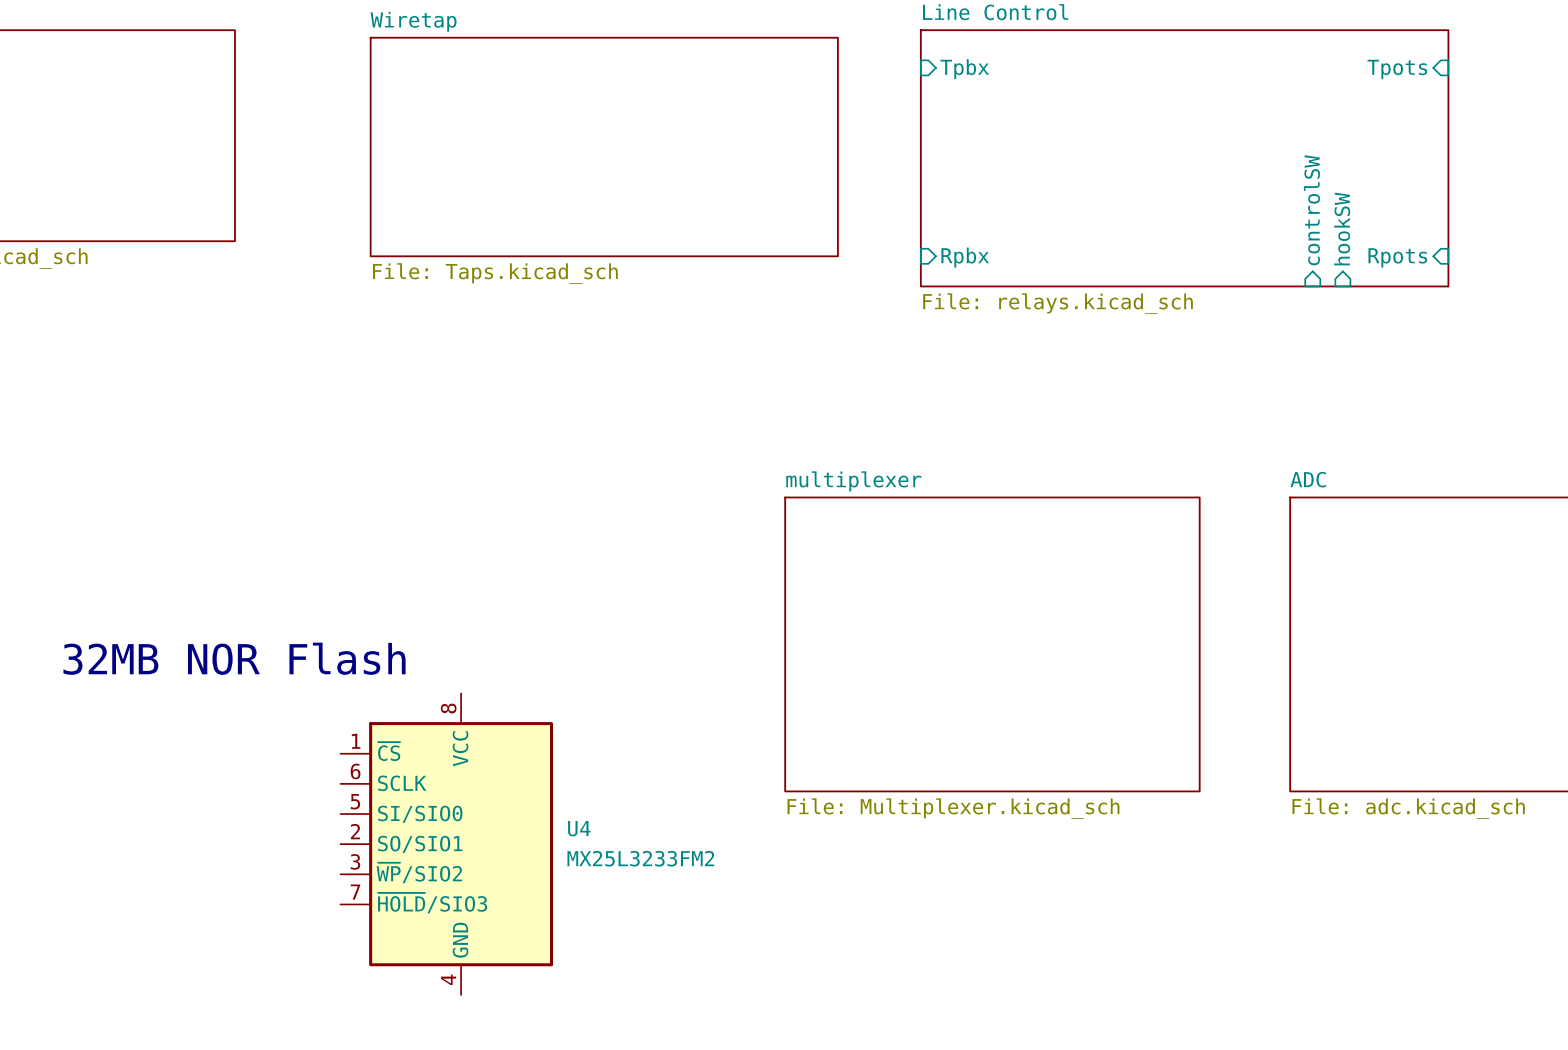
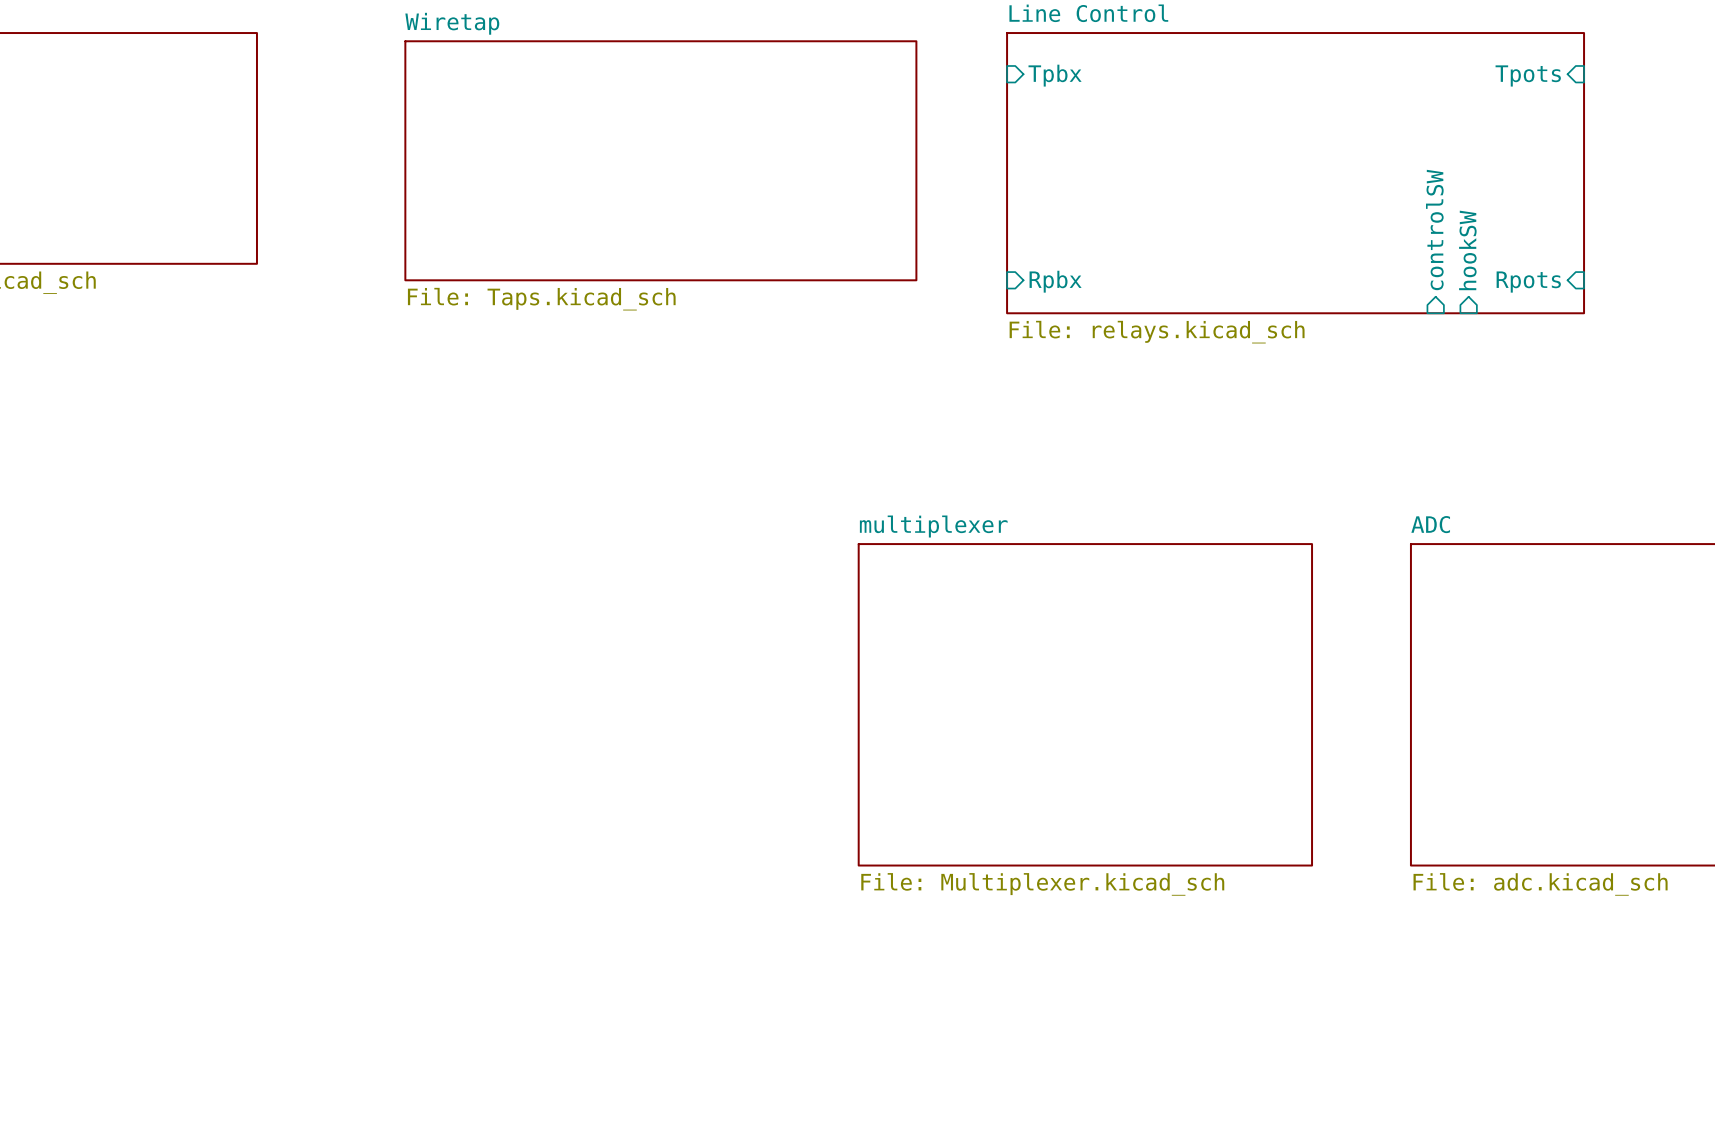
text: 32MB NOR Flash (234, 658) -> none
U4: MX25L3233FM2 (446, 844) -> none

